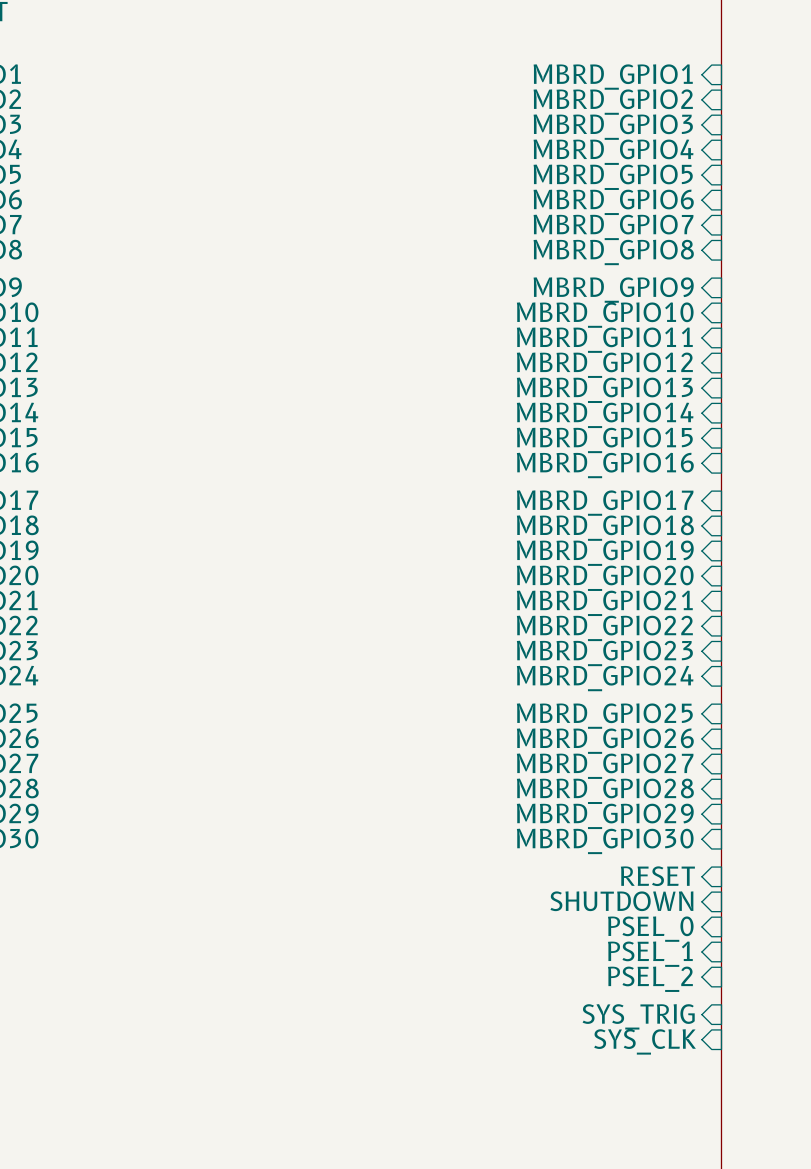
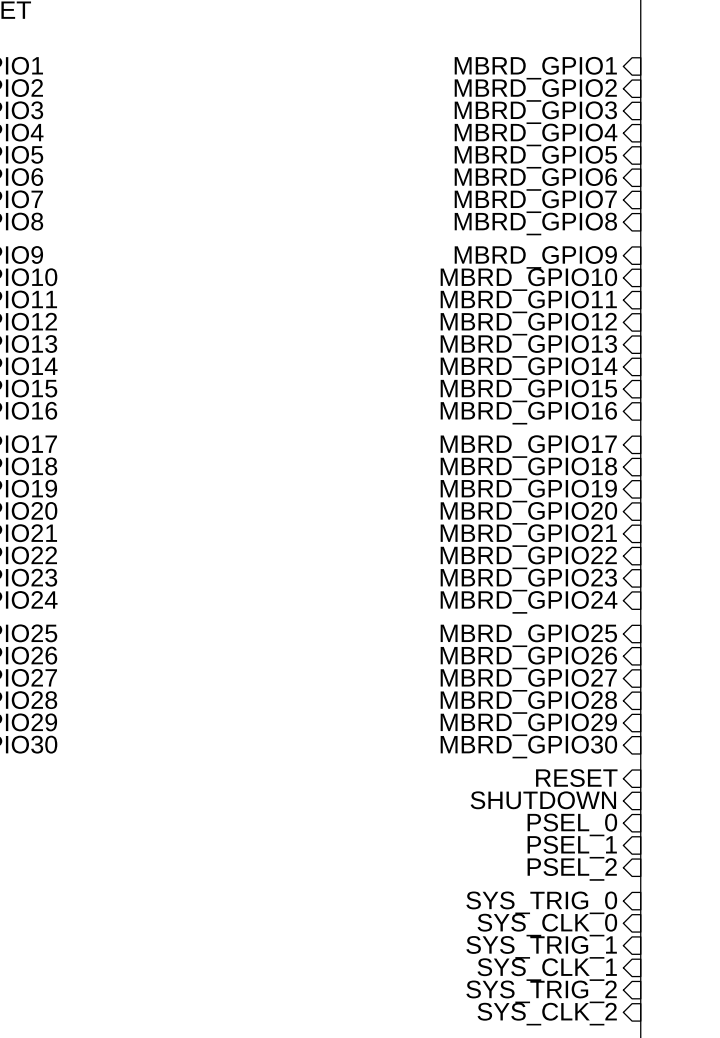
sheet pin: SYS_TRIG (638, 1016) -> SYS_TRIG_0 (541, 902)
sheet pin: SYS_CLK (645, 1041) -> SYS_CLK_0 (547, 925)
sheet pin: none -> SYS_TRIG_1 (541, 947)
sheet pin: none -> SYS_CLK_1 (547, 969)
sheet pin: none -> SYS_TRIG_2 (541, 991)
sheet pin: none -> SYS_CLK_2 (547, 1014)

